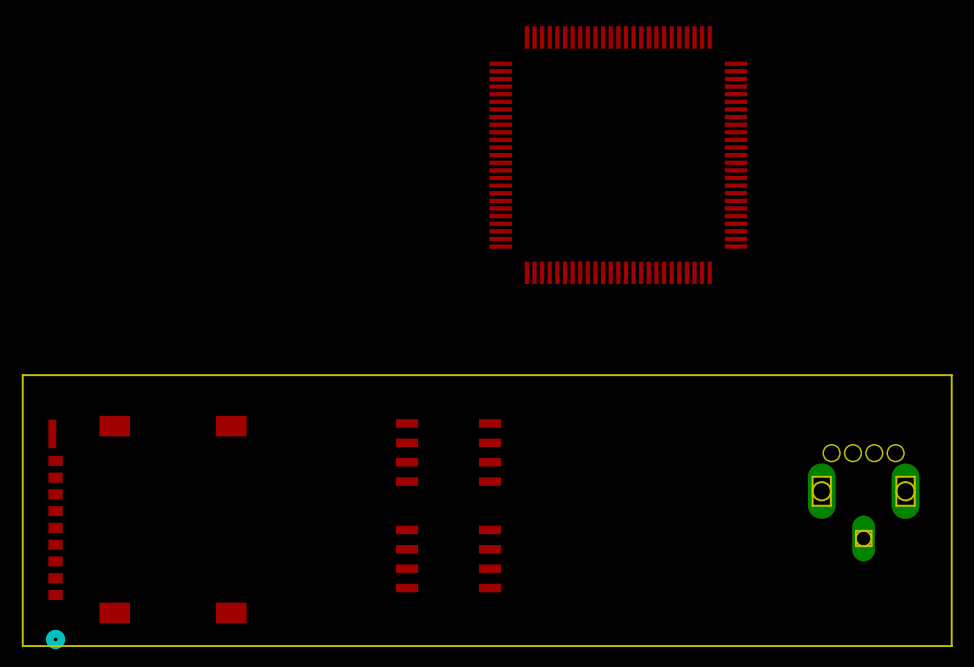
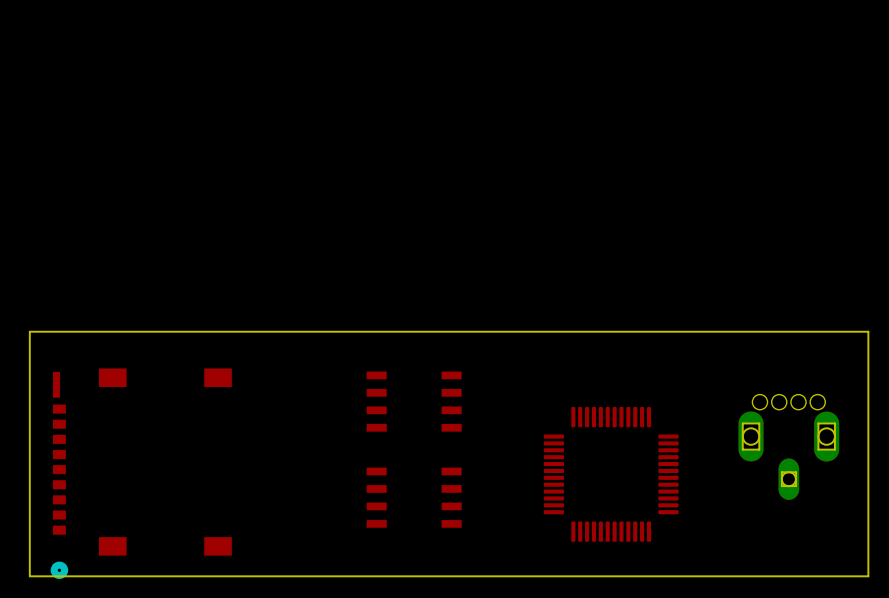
part: (618, 155) -> none
part: none -> (611, 474)

